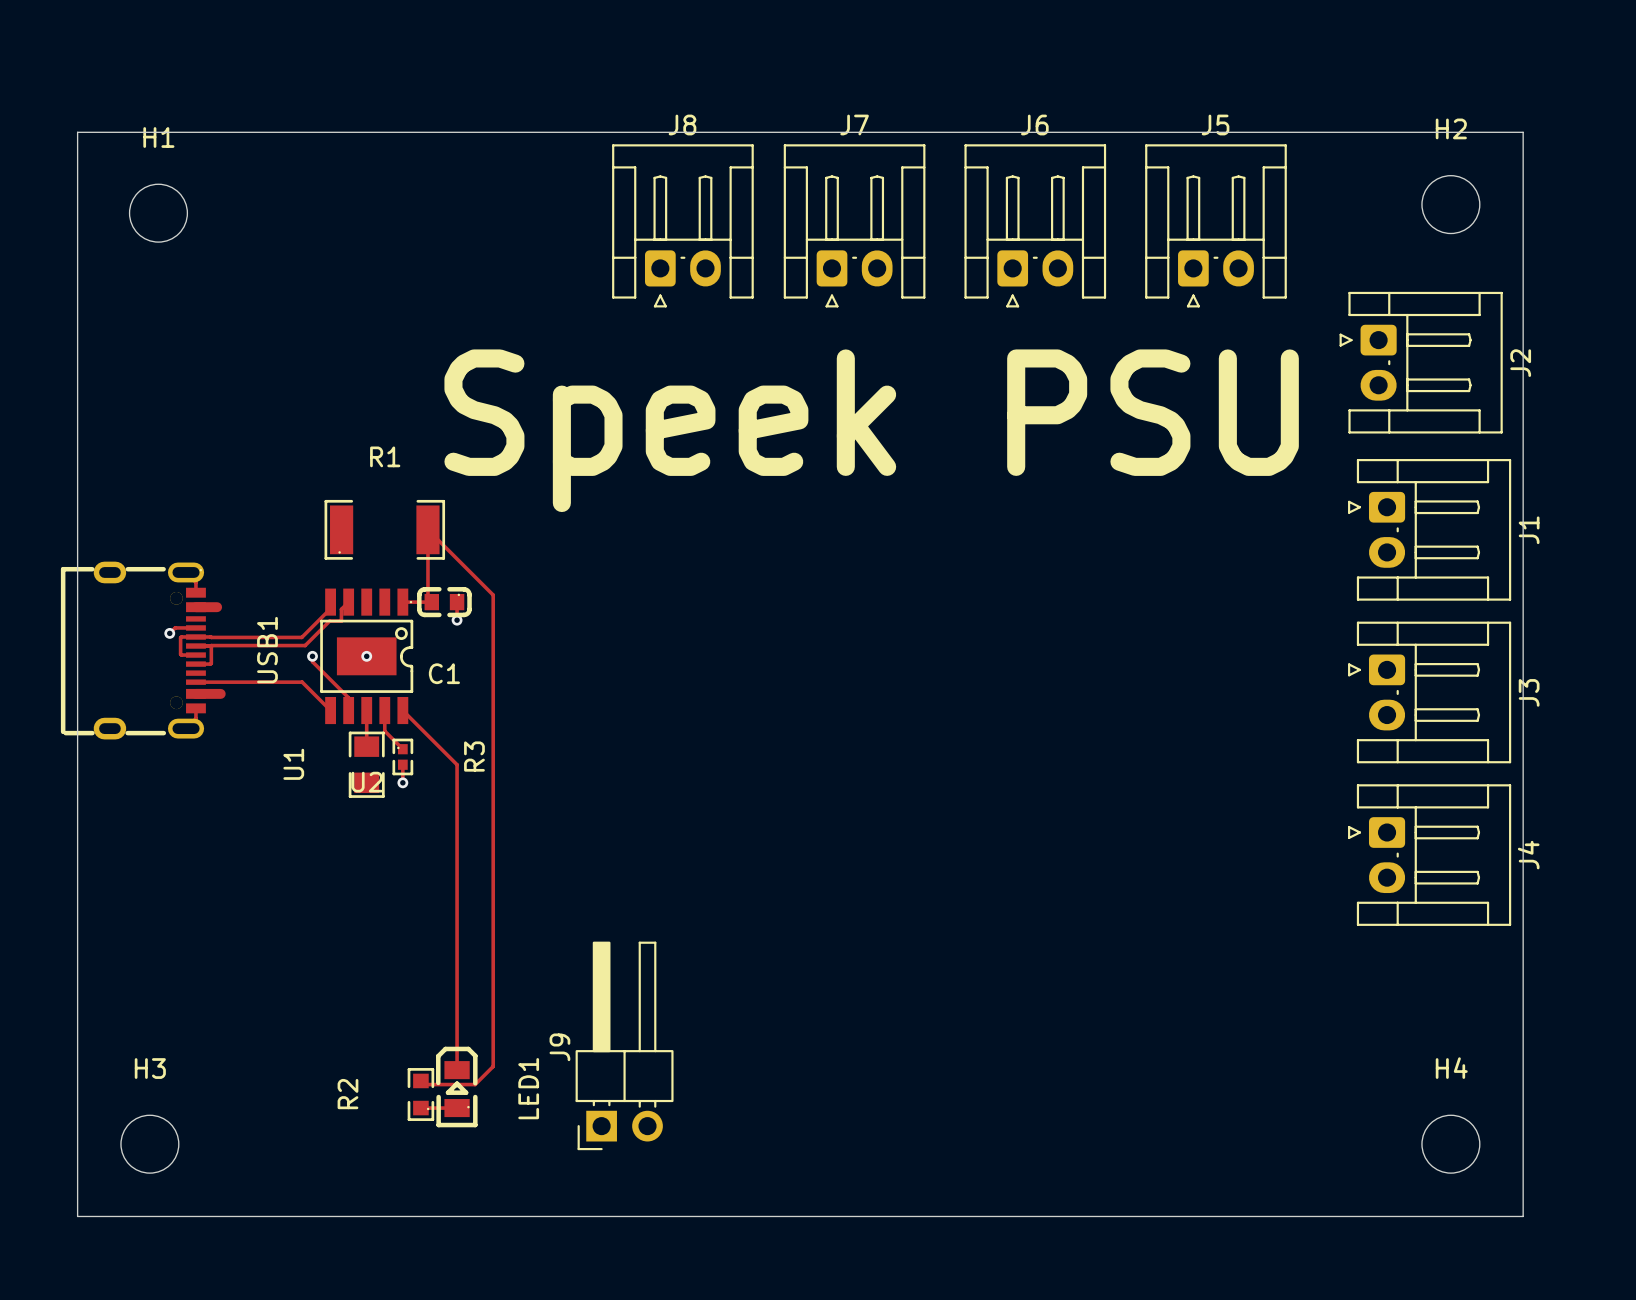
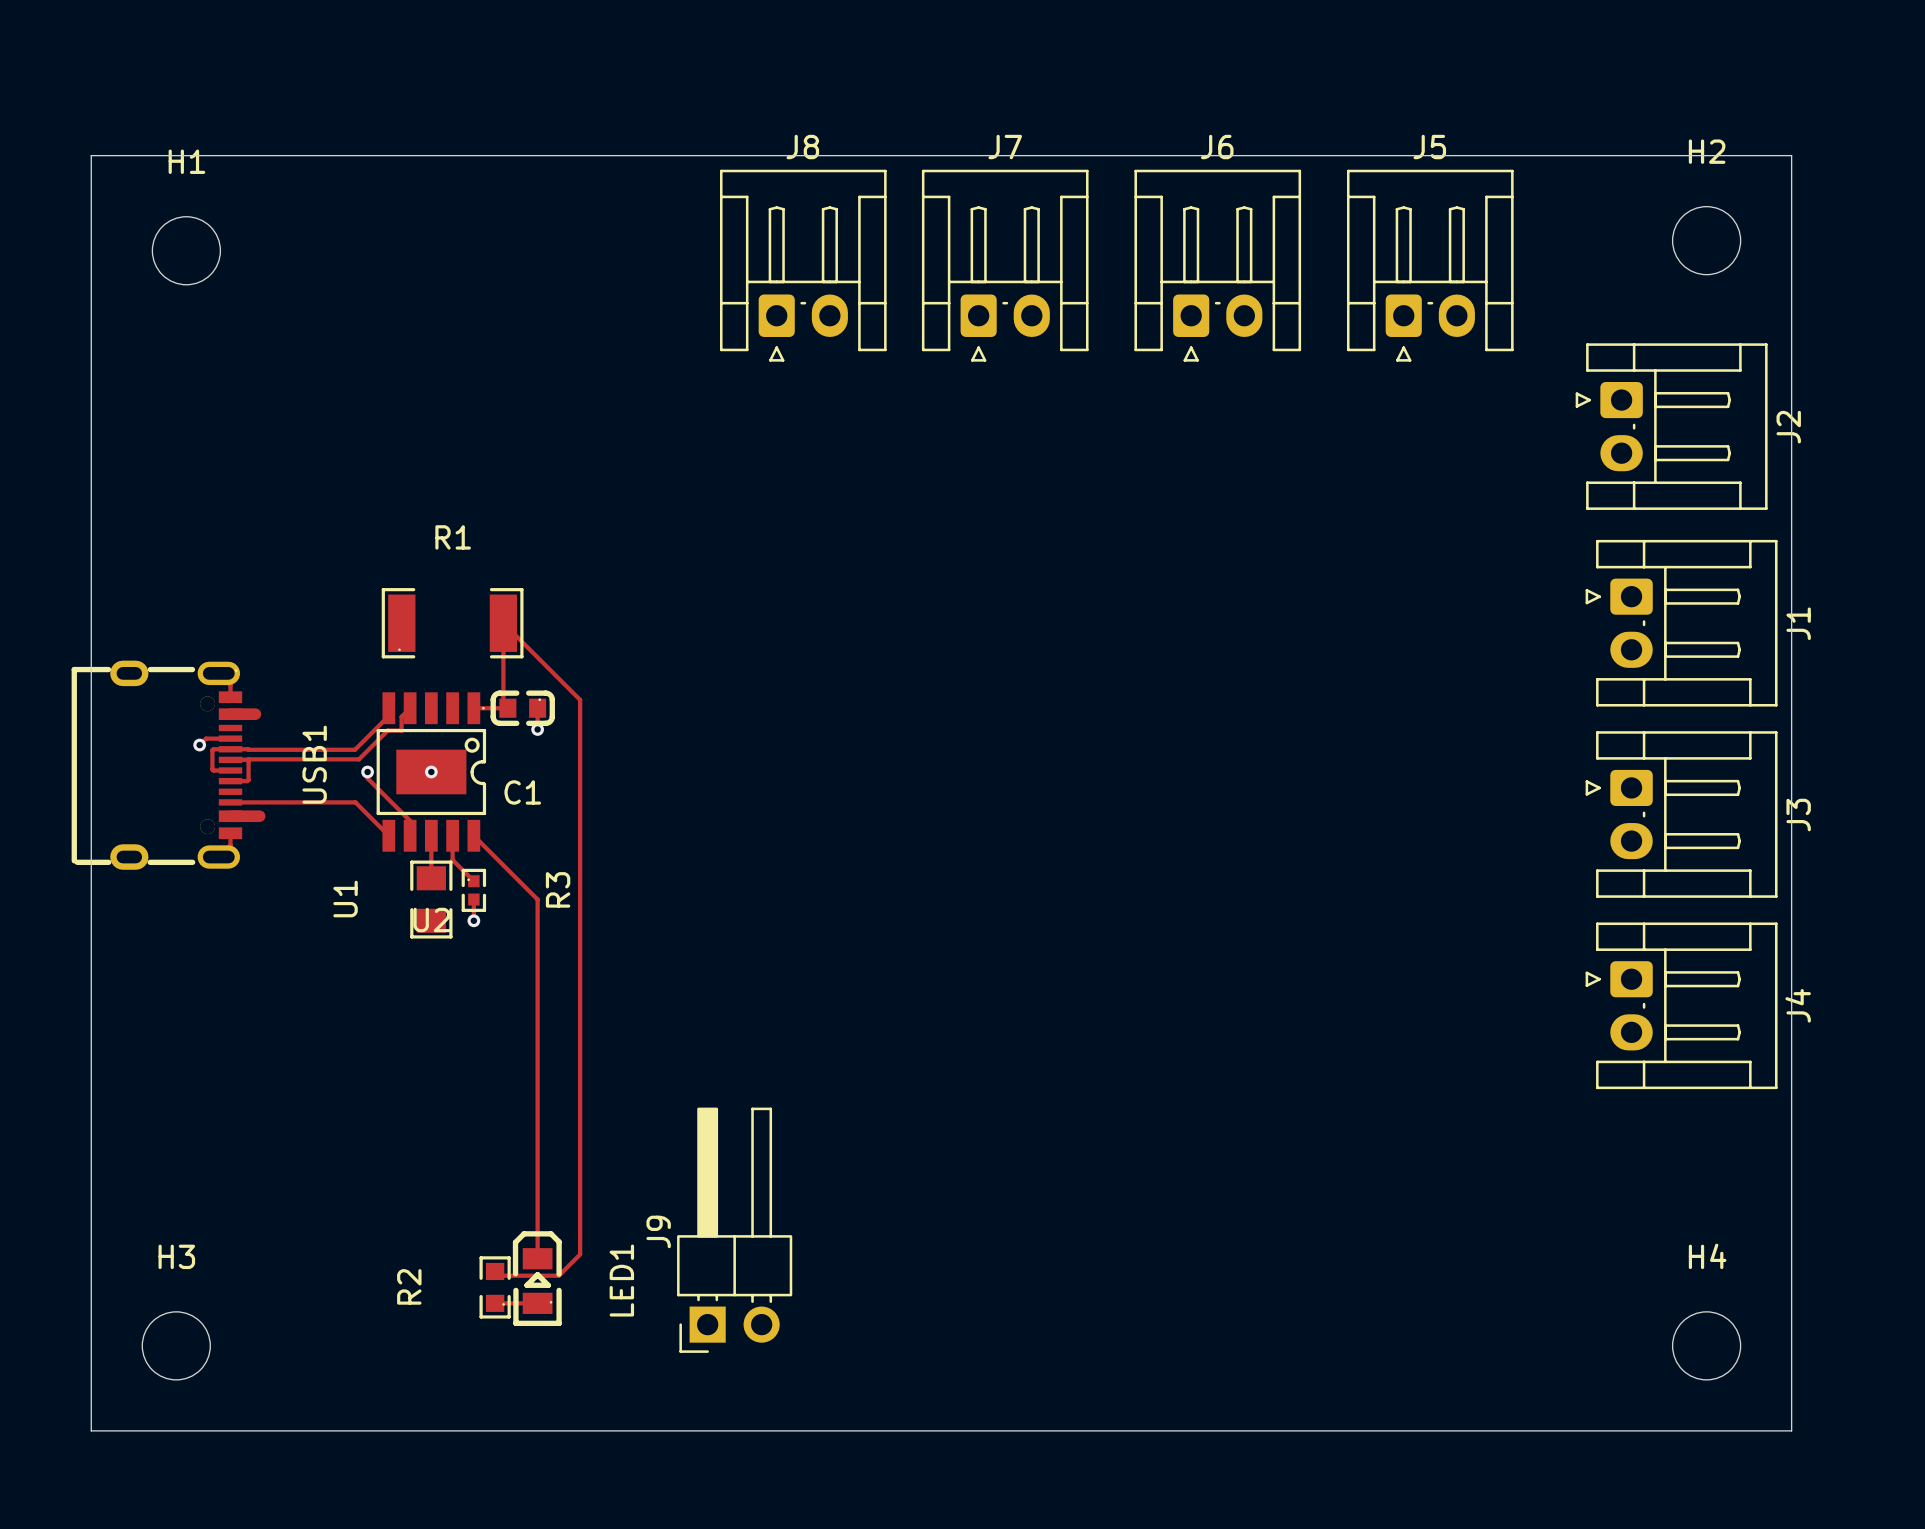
text: Speek PSU (871, 430) -> none

